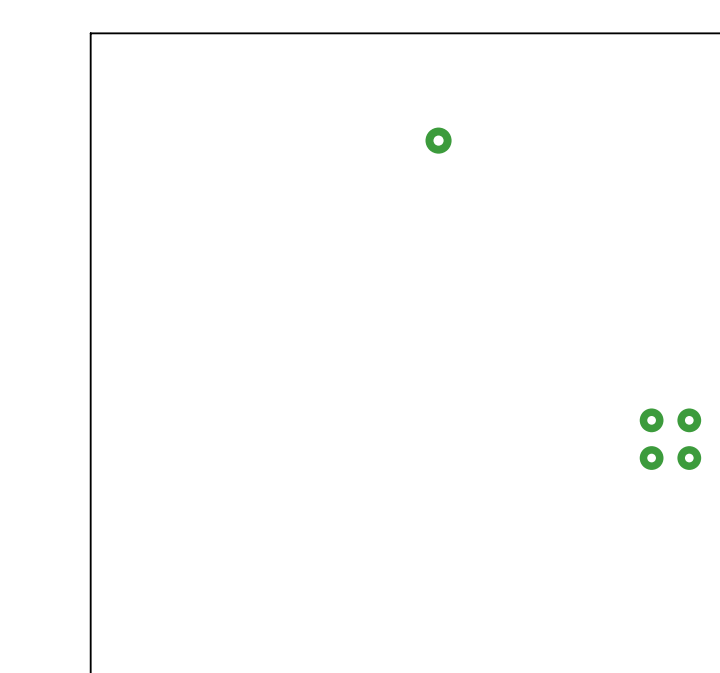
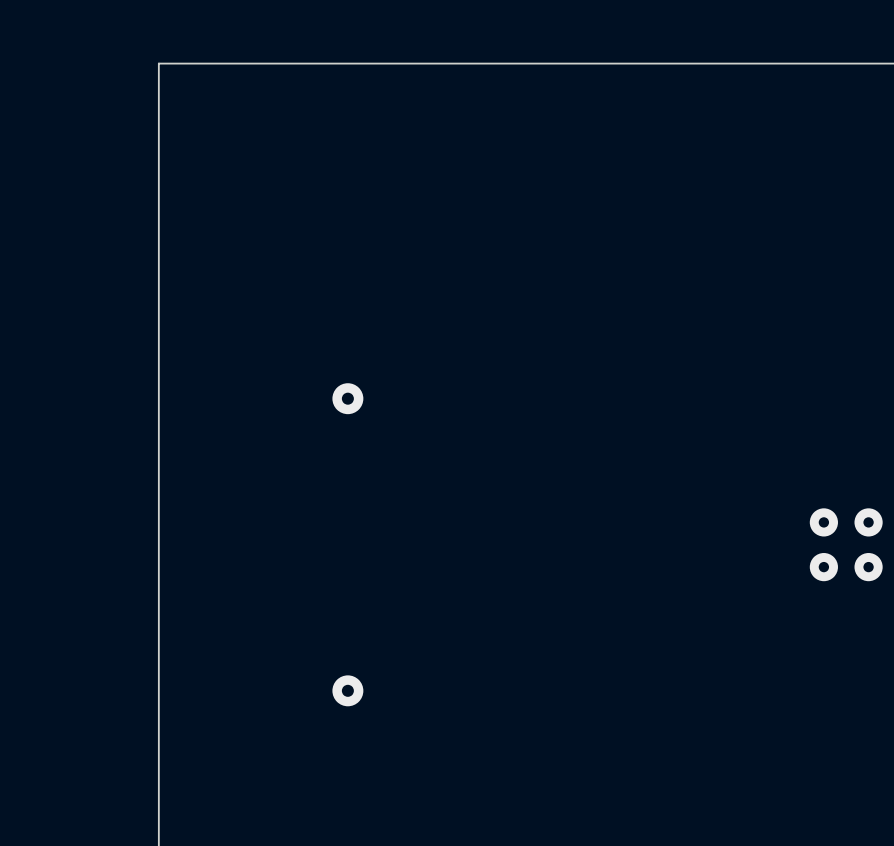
via: (438, 140) -> none
via: none -> (347, 398)
via: none -> (347, 690)

